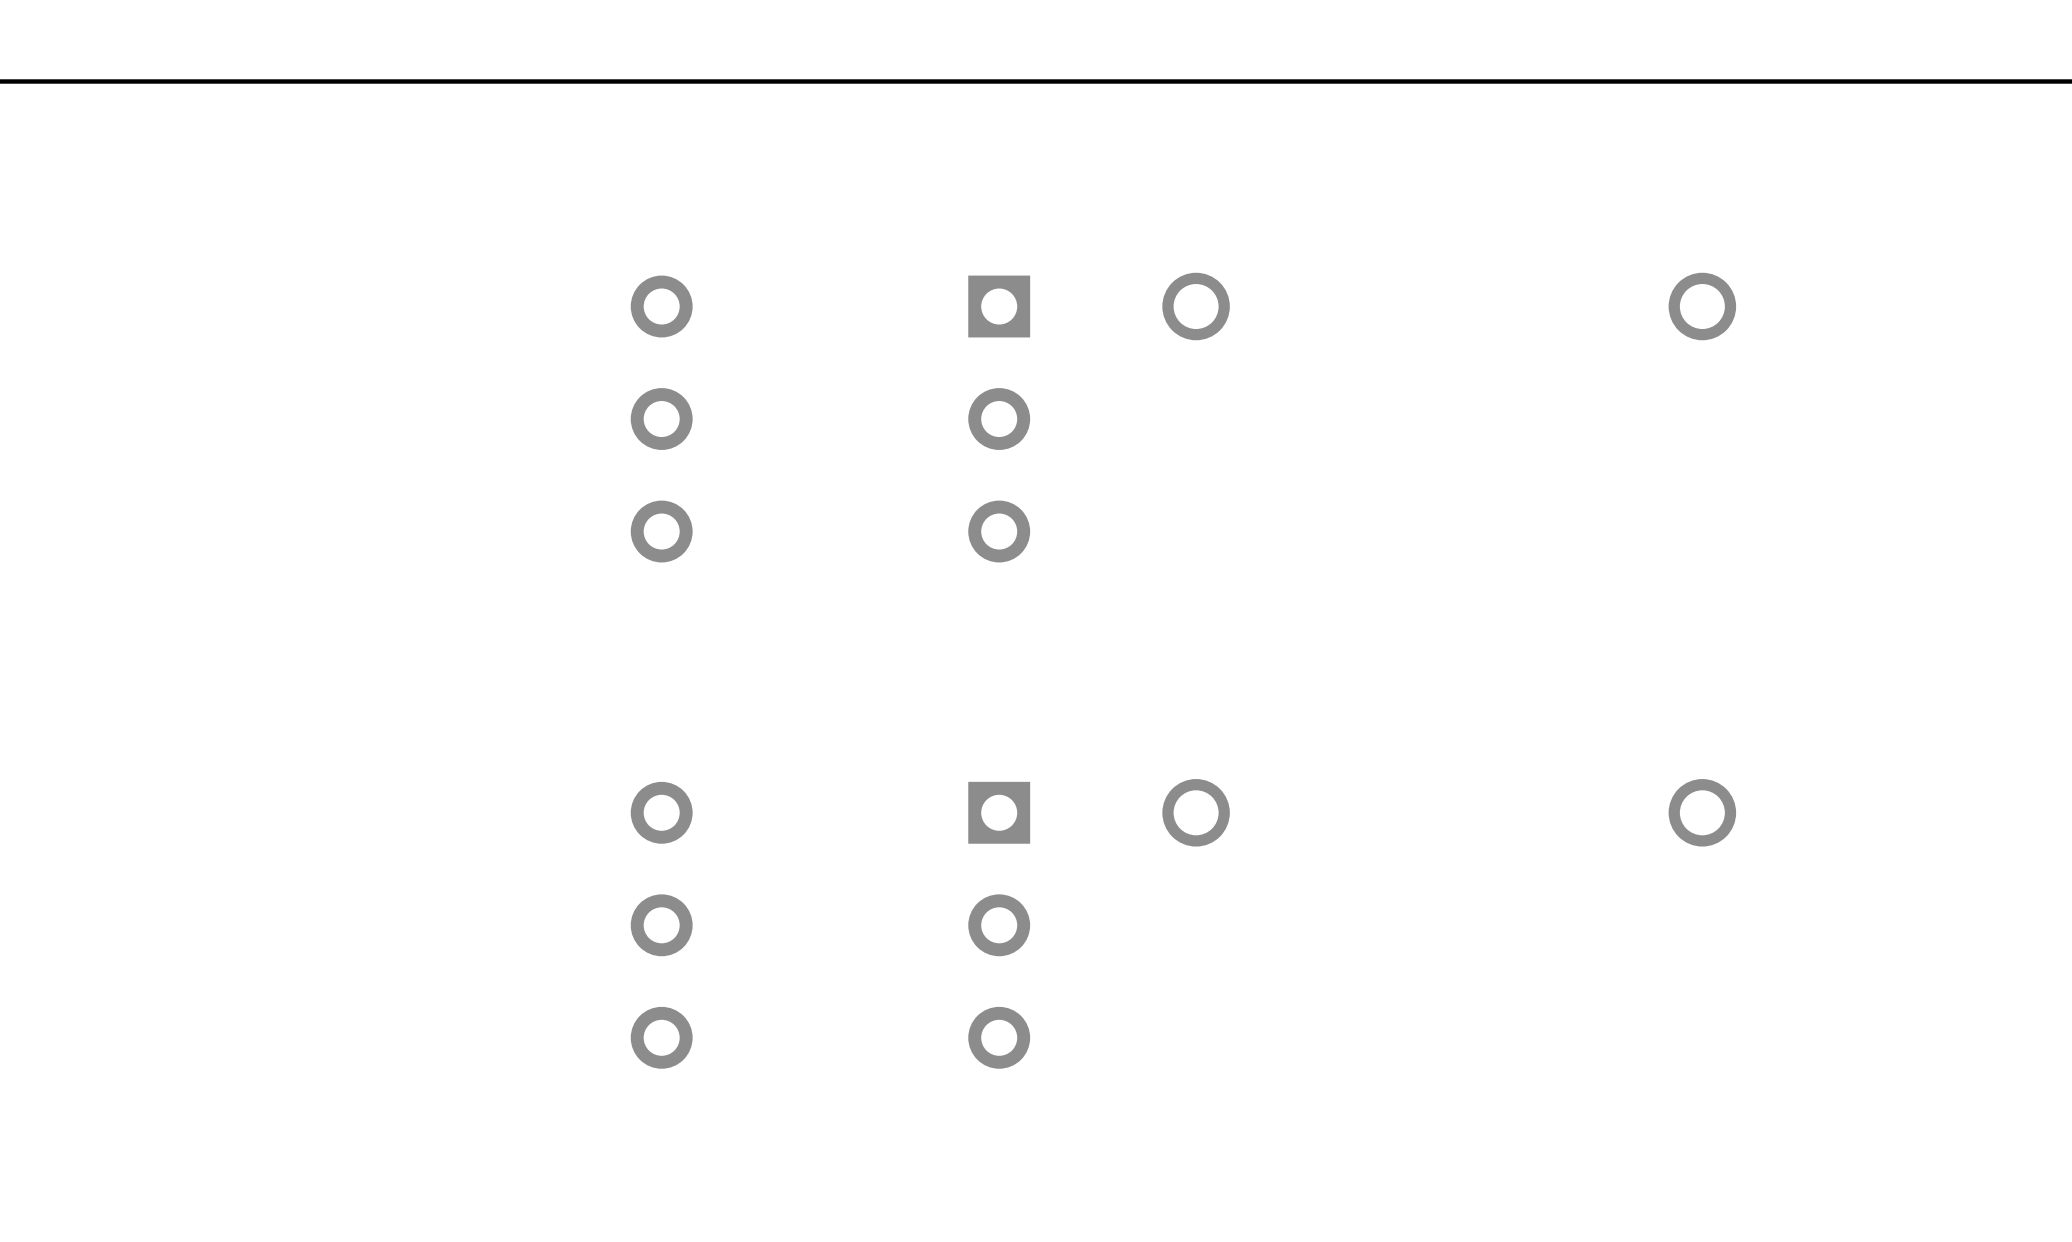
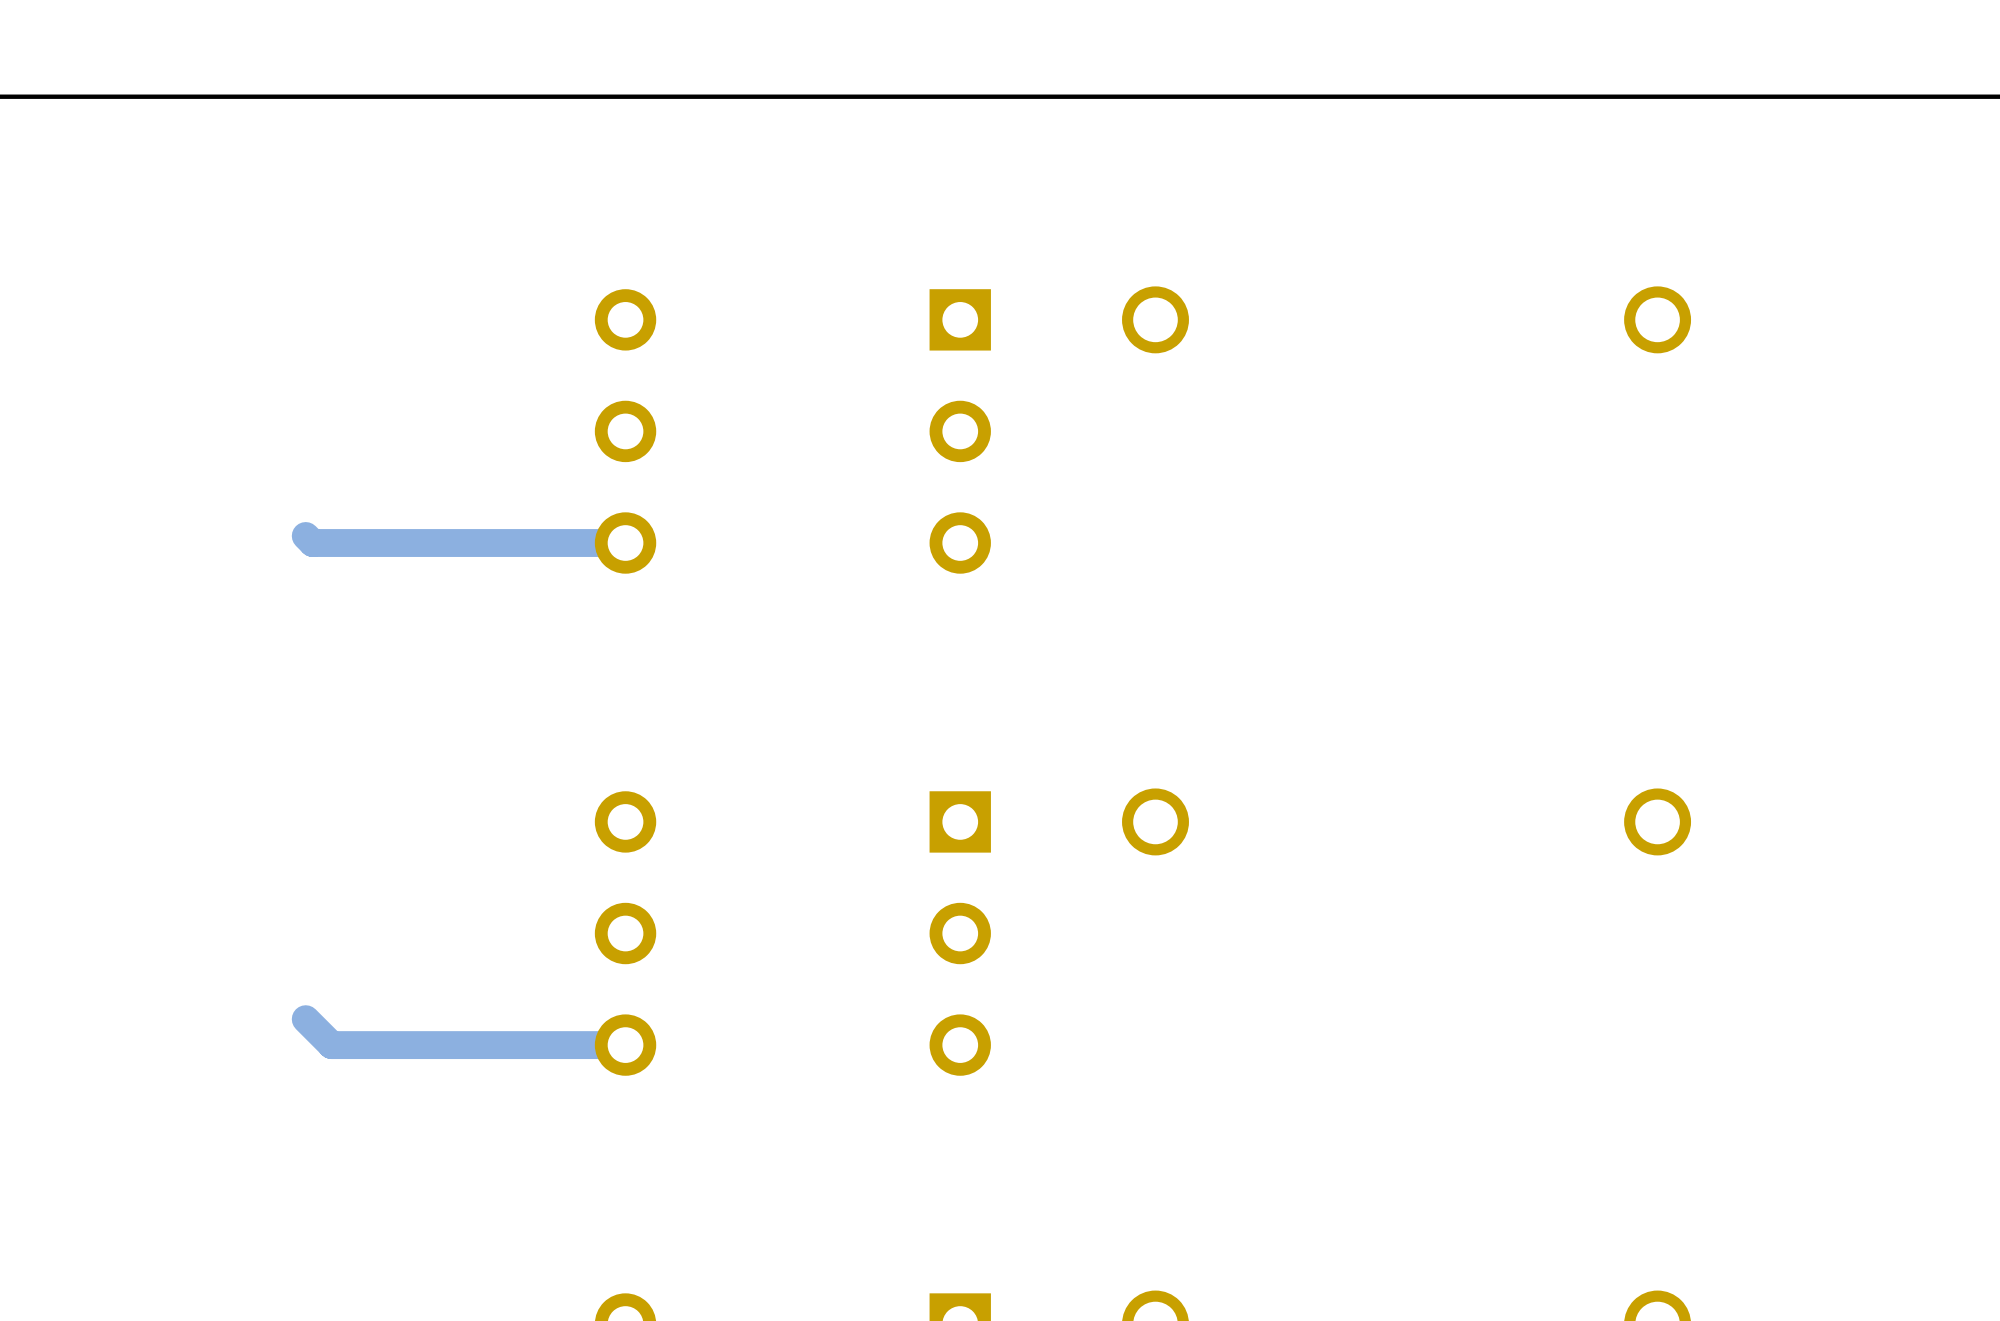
track: none -> (305, 535) (312, 543) (625, 543)
track: none -> (305, 1019) (331, 1045) (625, 1045)

